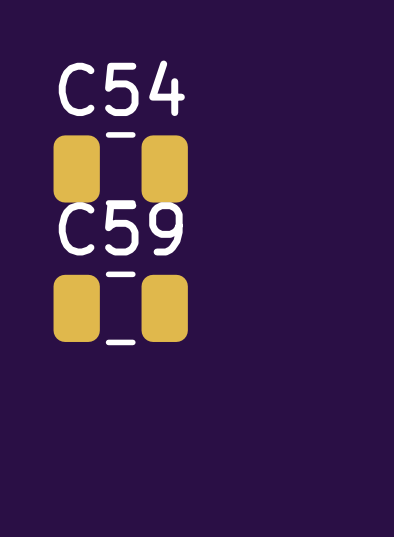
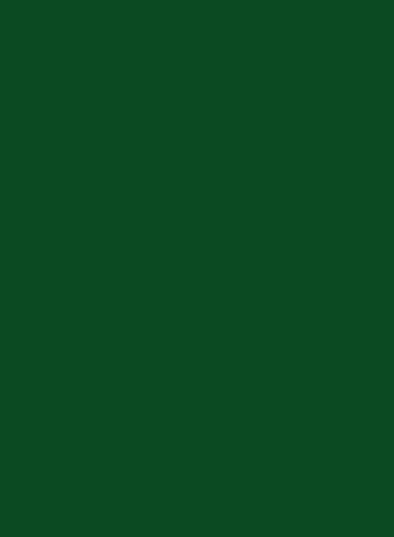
C54: (120, 168) -> none
C59: (120, 308) -> none

